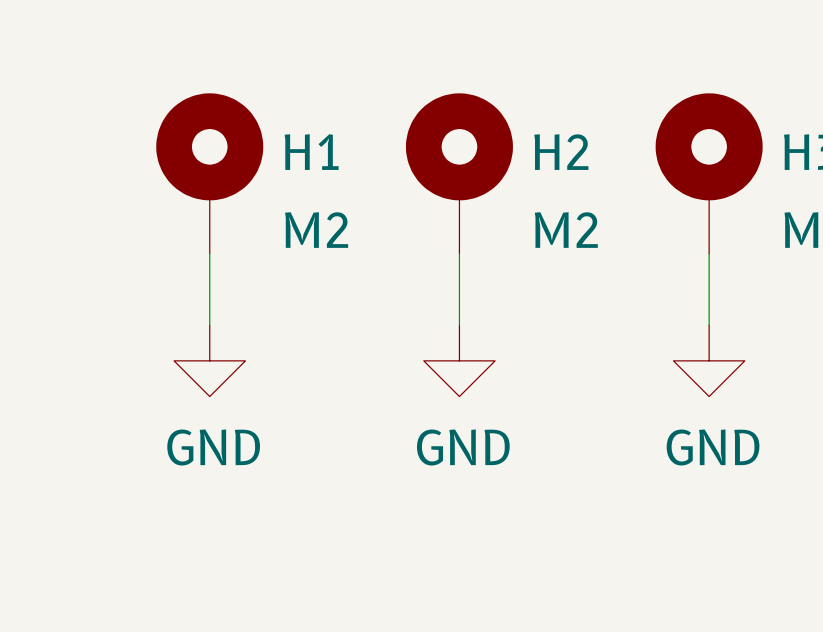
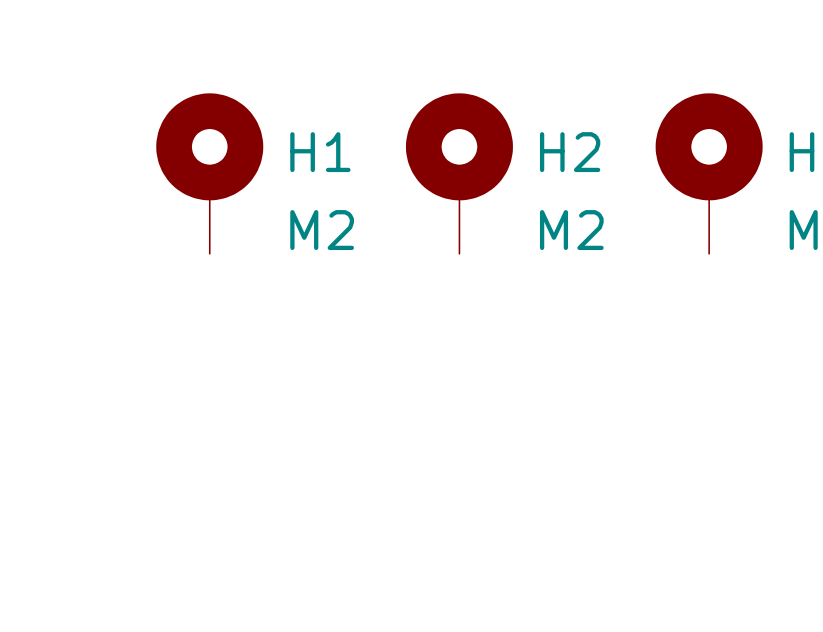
wire: (209, 253) (209, 325) -> none
wire: (459, 253) (459, 325) -> none
wire: (709, 253) (709, 325) -> none
power symbol: GND (209, 360) -> none
power symbol: GND (459, 360) -> none
power symbol: GND (709, 360) -> none

